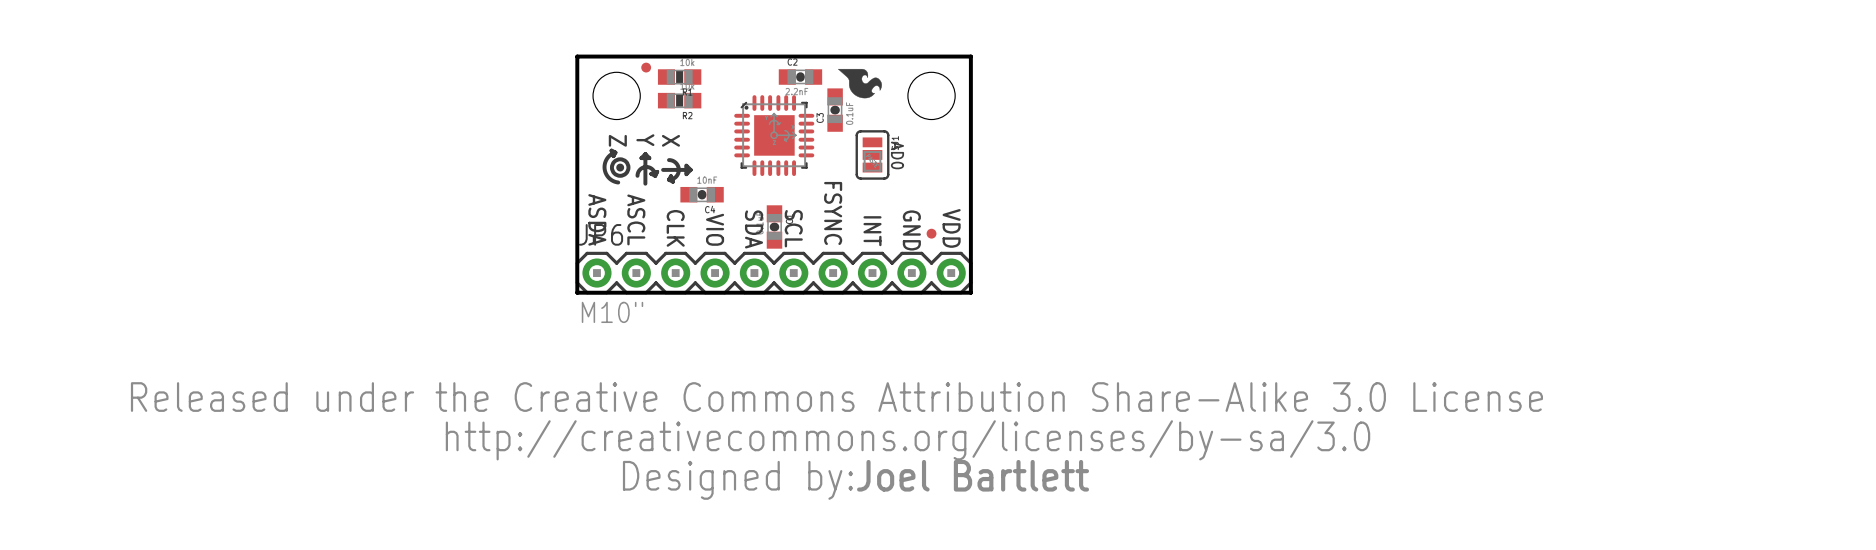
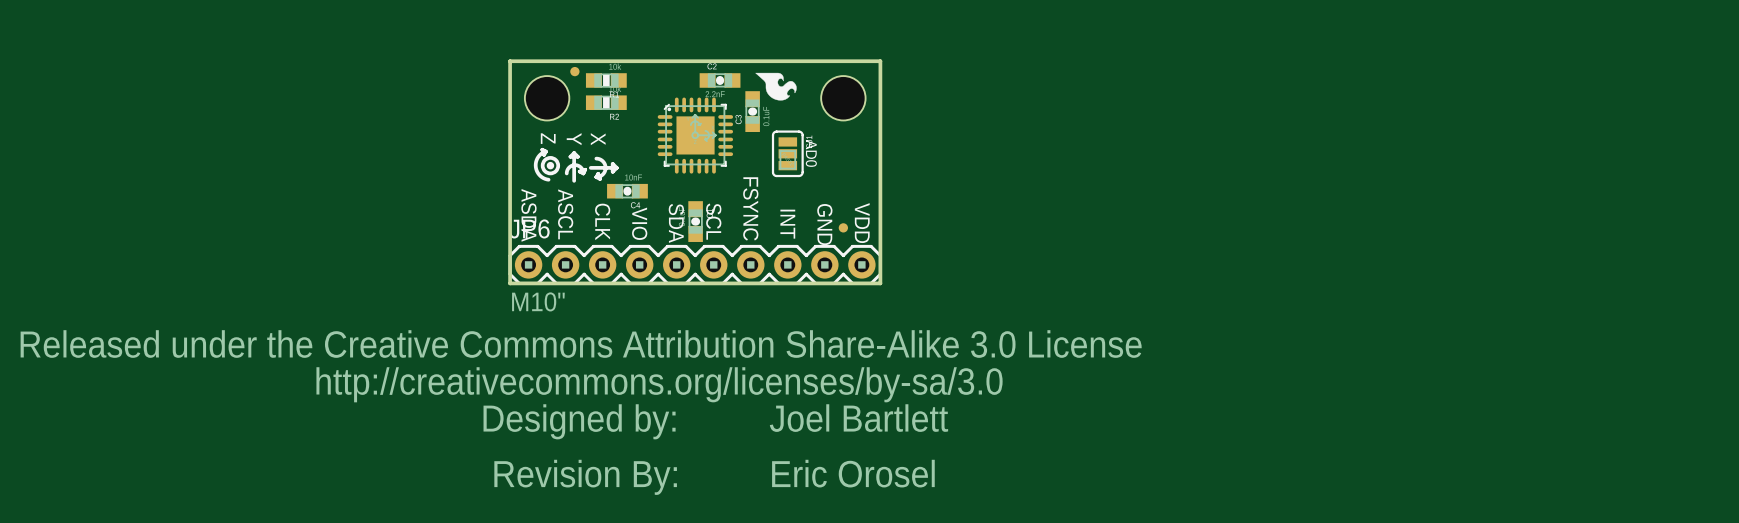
drawing position: (836, 440) -> (581, 384)
text position: Joel Bartlett (973, 475) -> Joel Bartlett (858, 418)
drawing: none -> [494, 459, 677, 495]
text: none -> Eric Orosel (853, 473)

